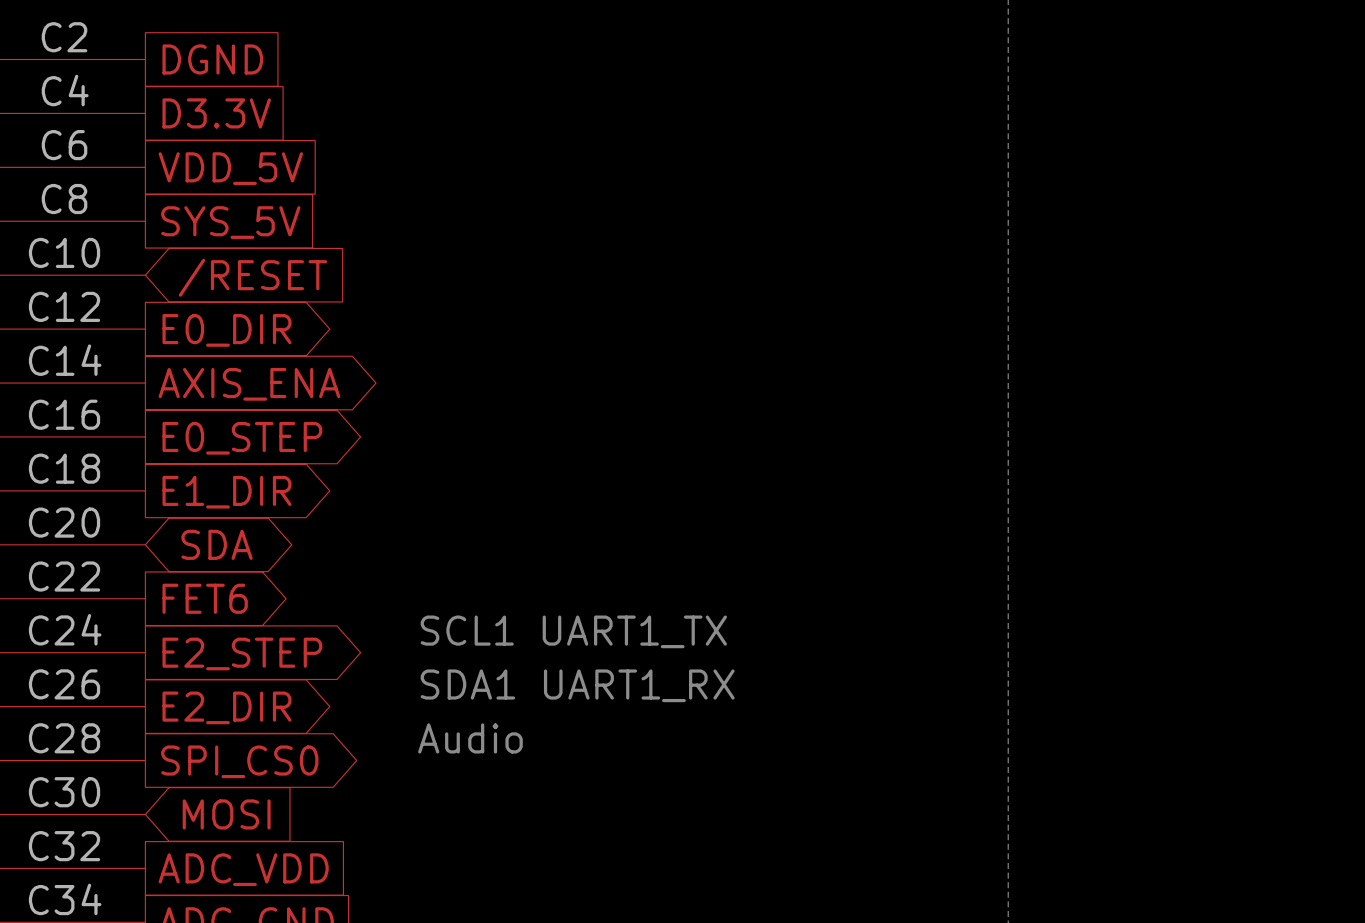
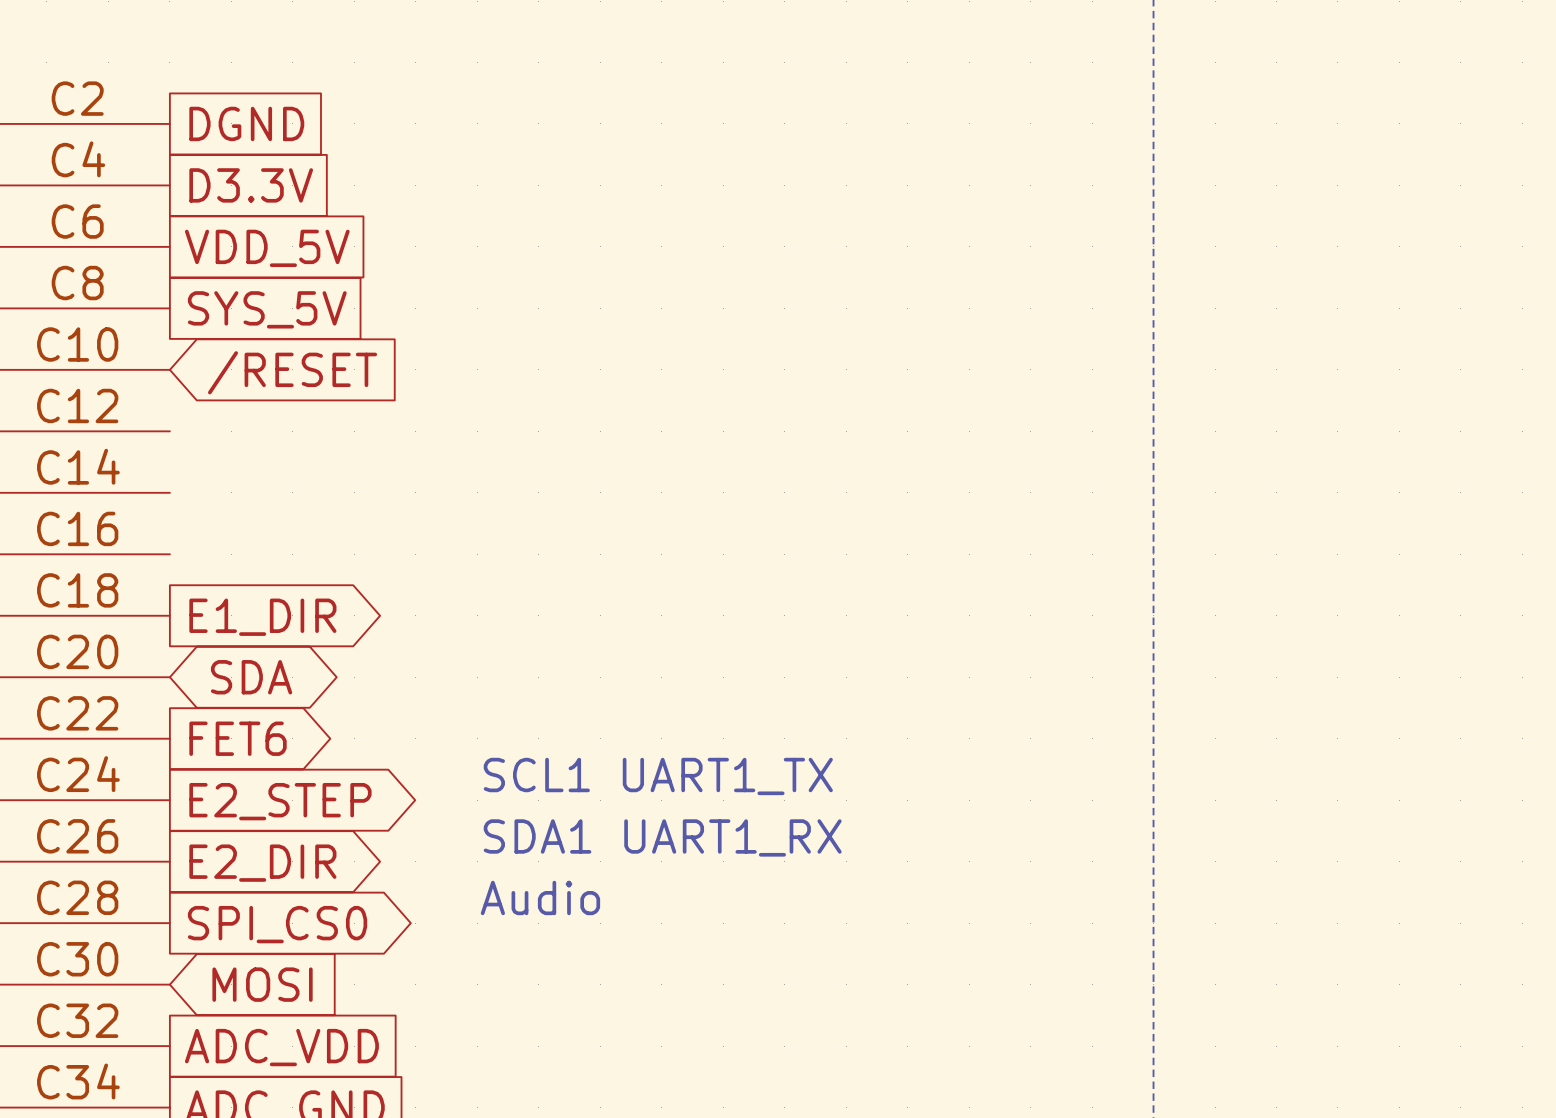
global label: E0_DIR (226, 330) -> none
global label: AXIS_ENA (249, 384) -> none
global label: E0_STEP (242, 438) -> none

